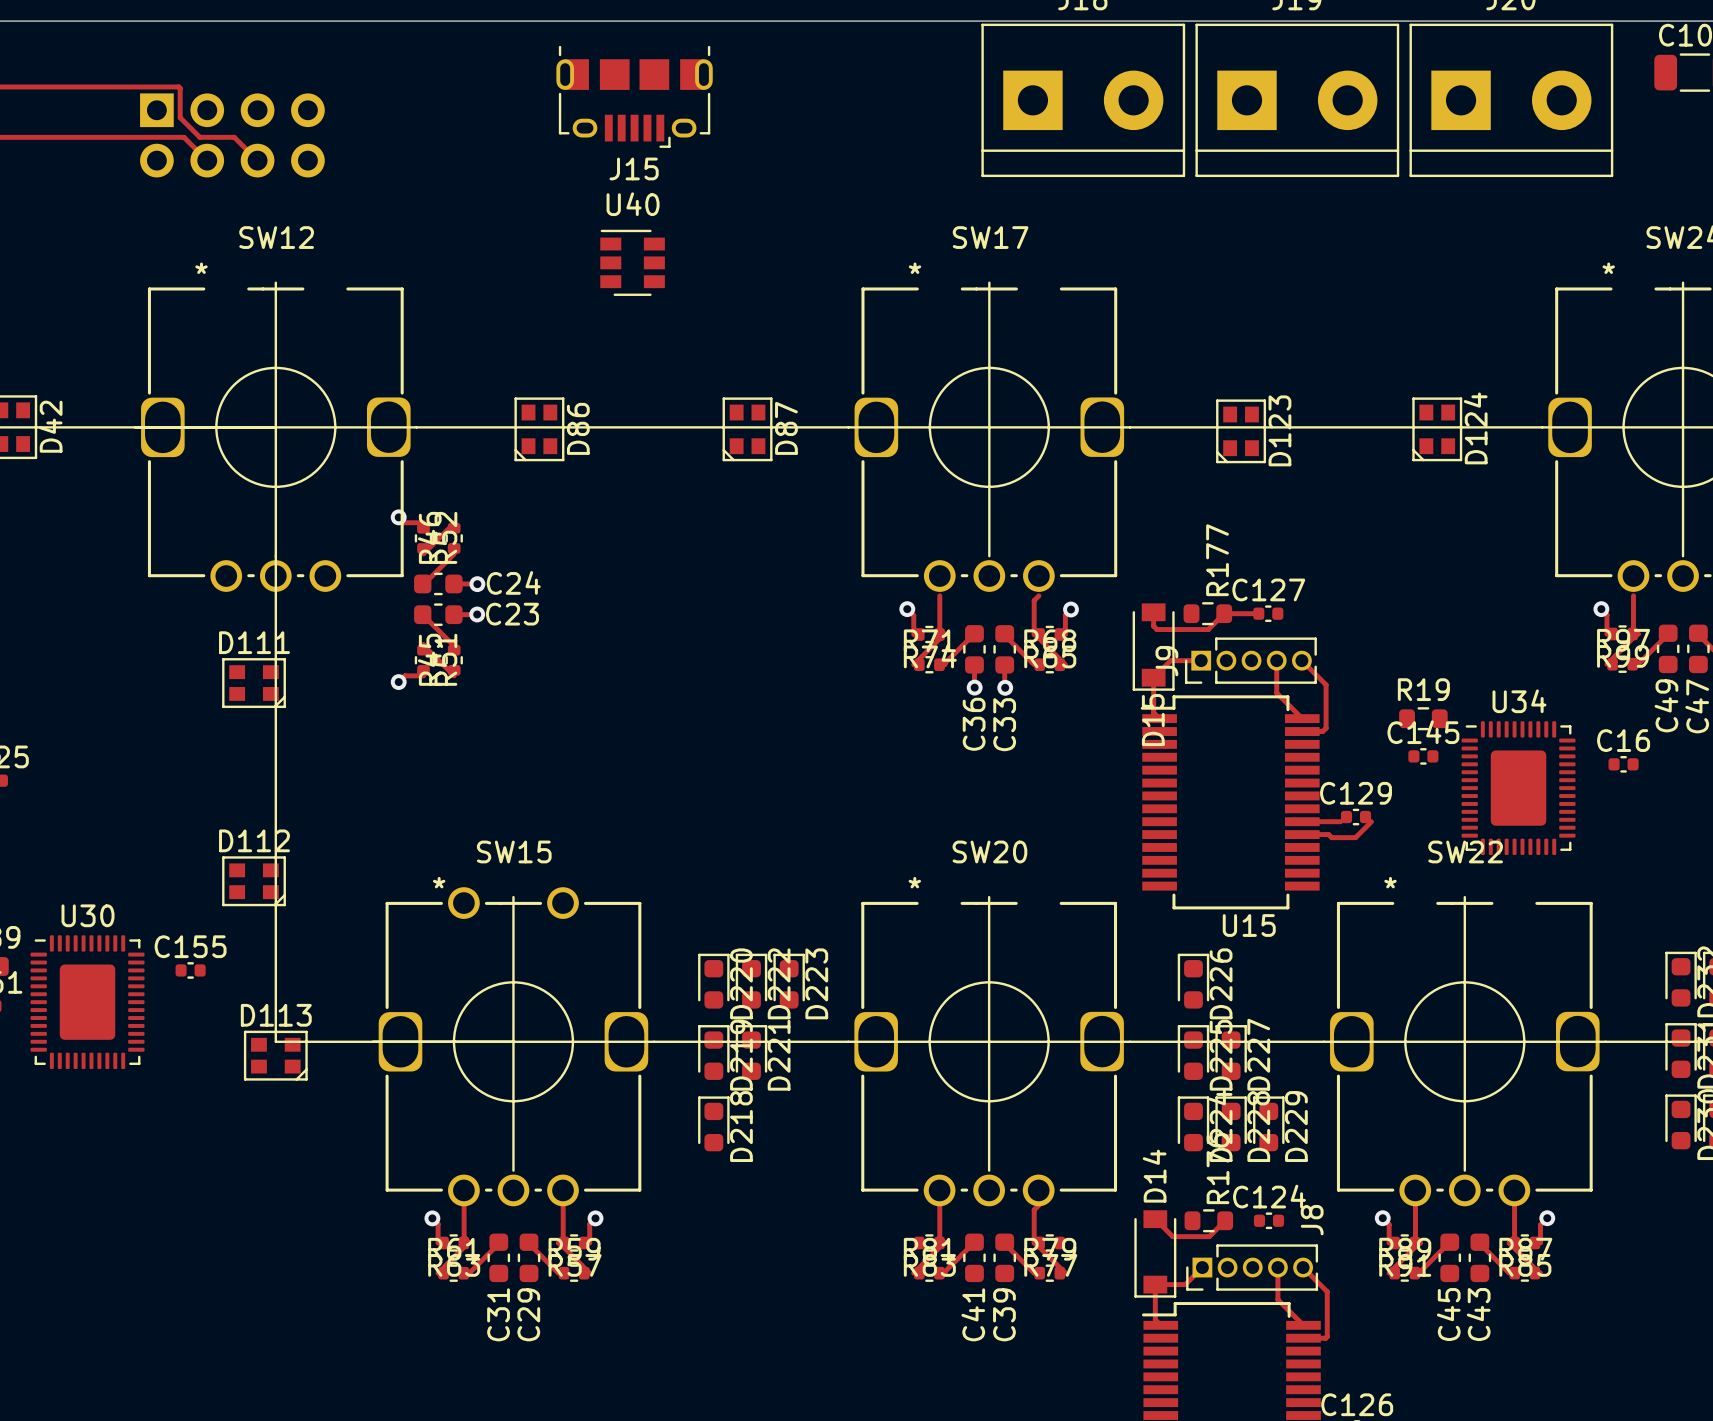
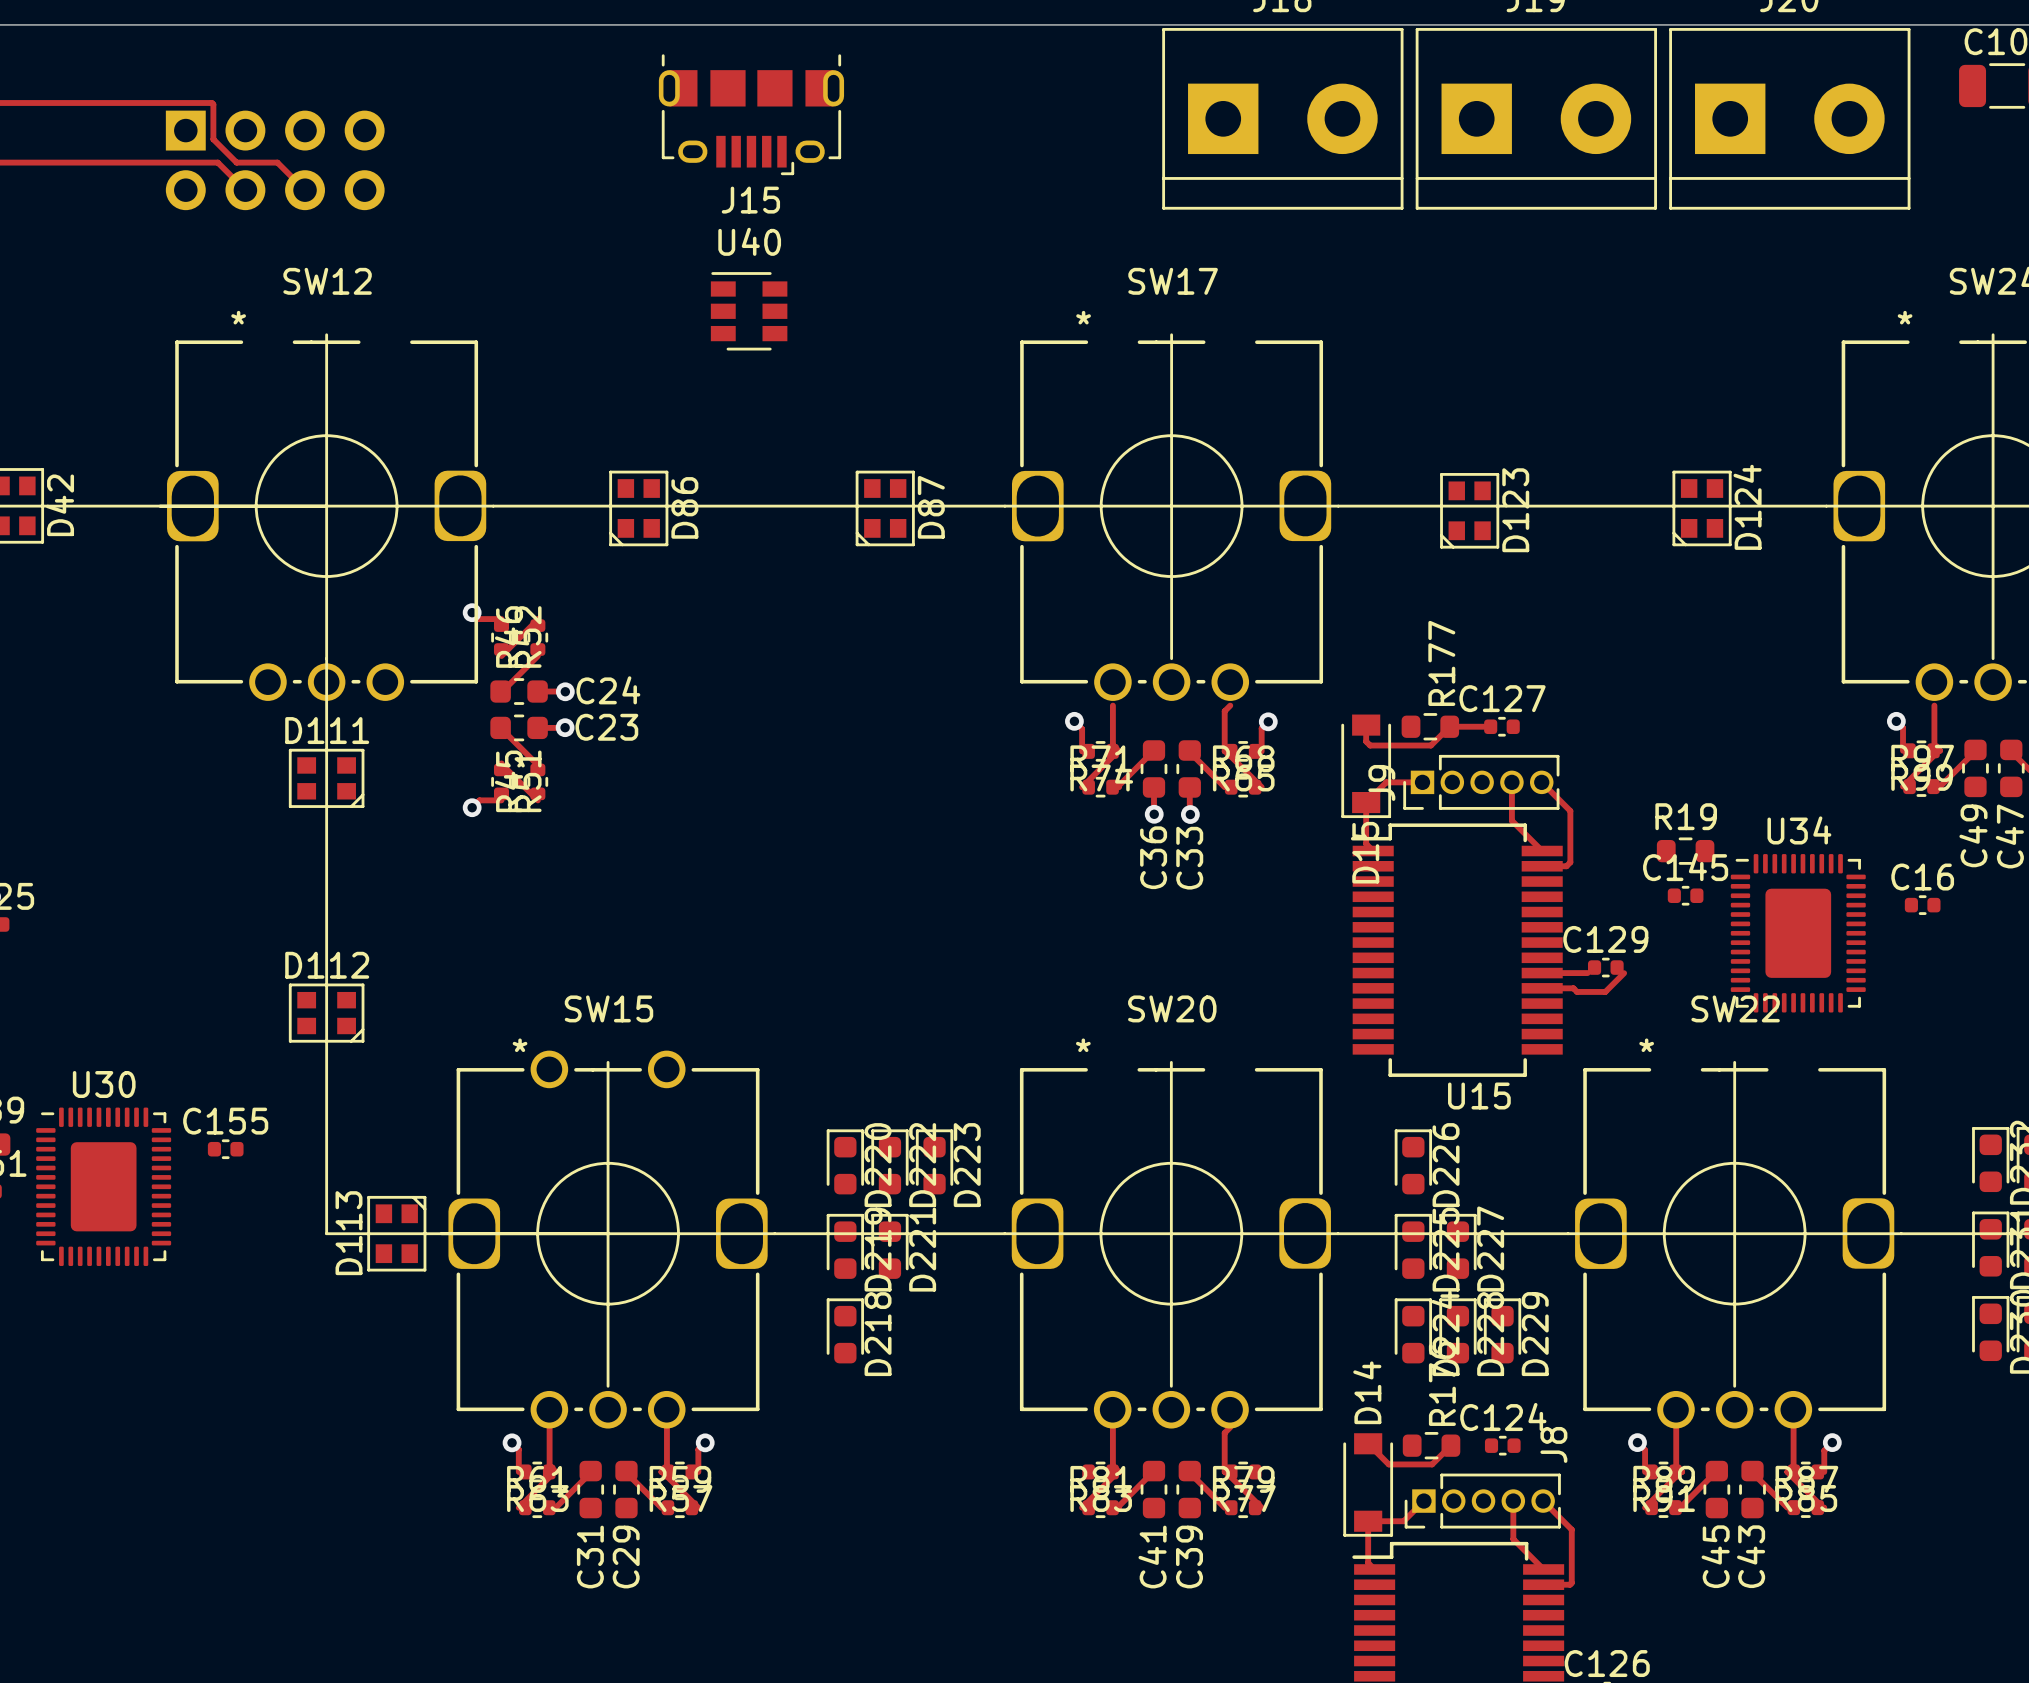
D111 position: (254, 683) -> (326, 778)
D112 position: (254, 881) -> (326, 1013)
D113 rotation: 0° (275, 1055) -> 90° counterclockwise (396, 1233)
D113 position: (275, 1055) -> (396, 1233)

